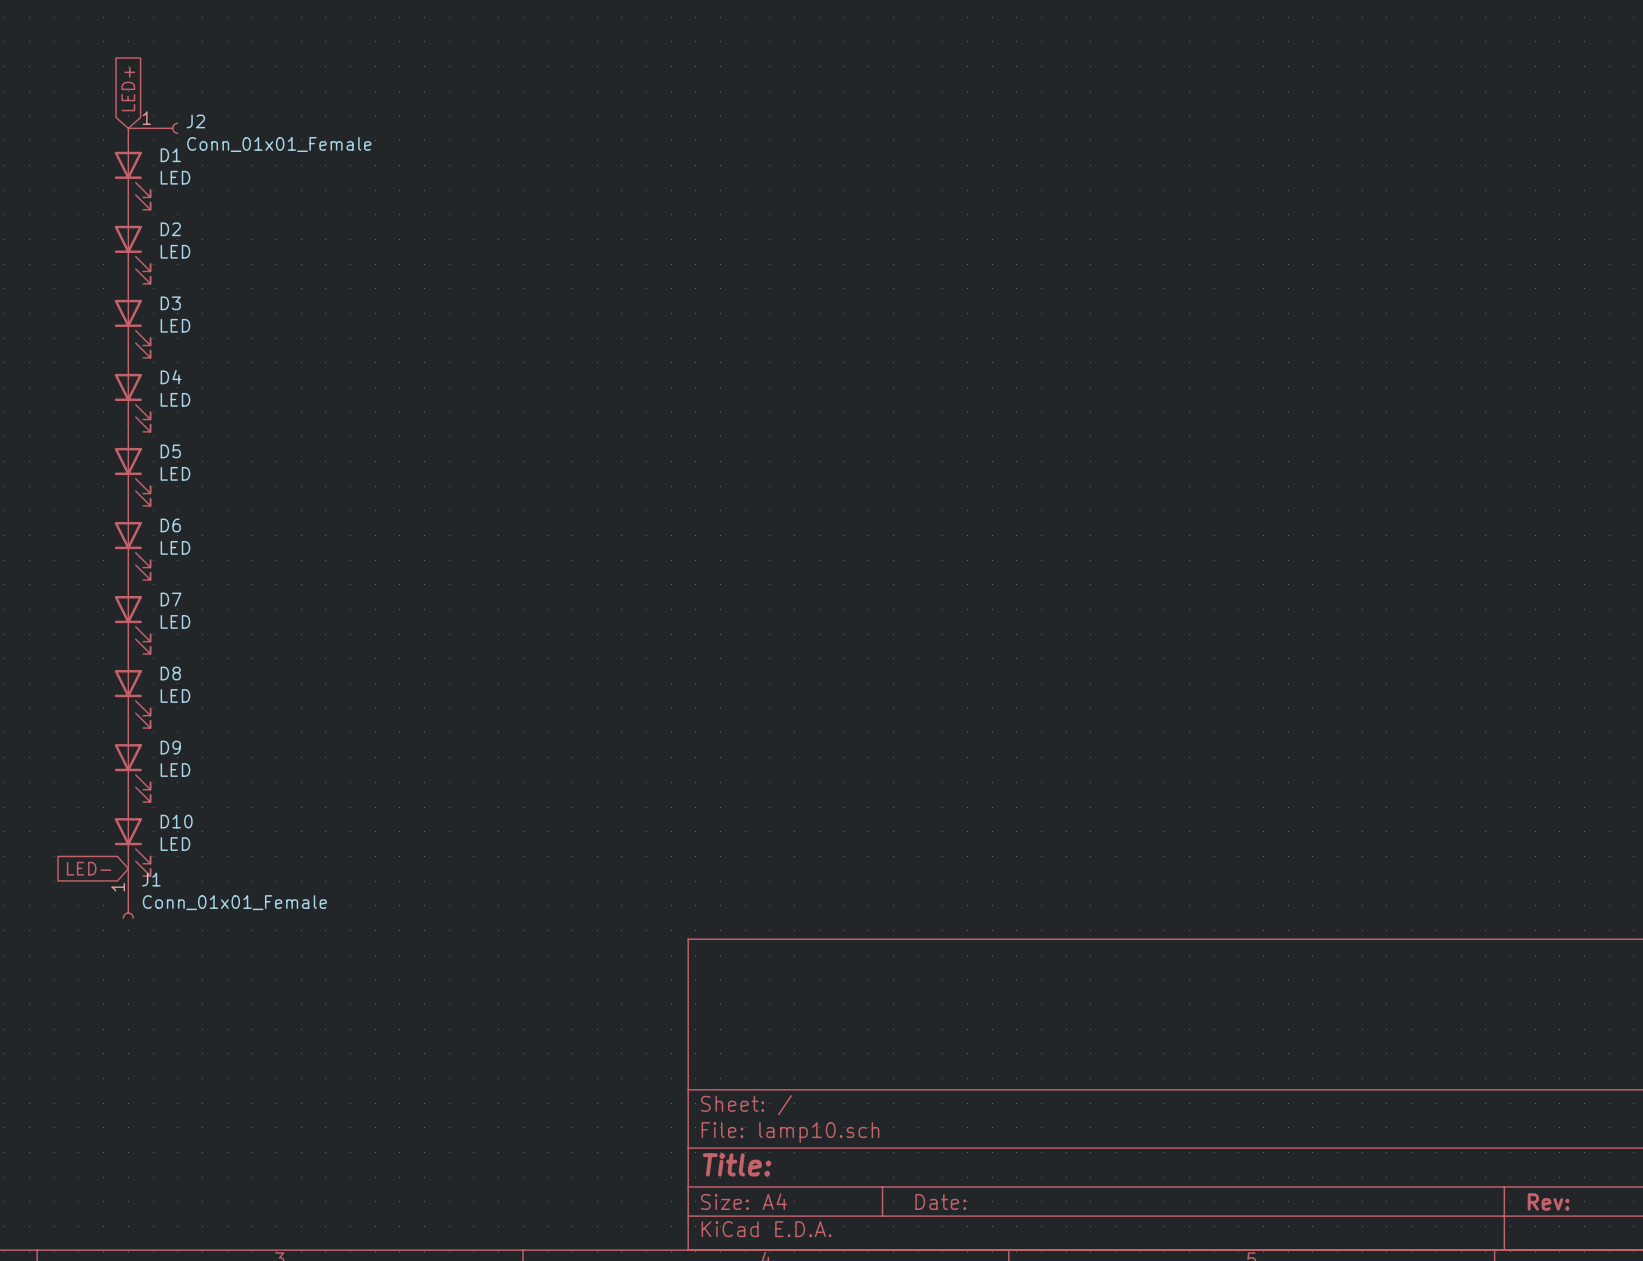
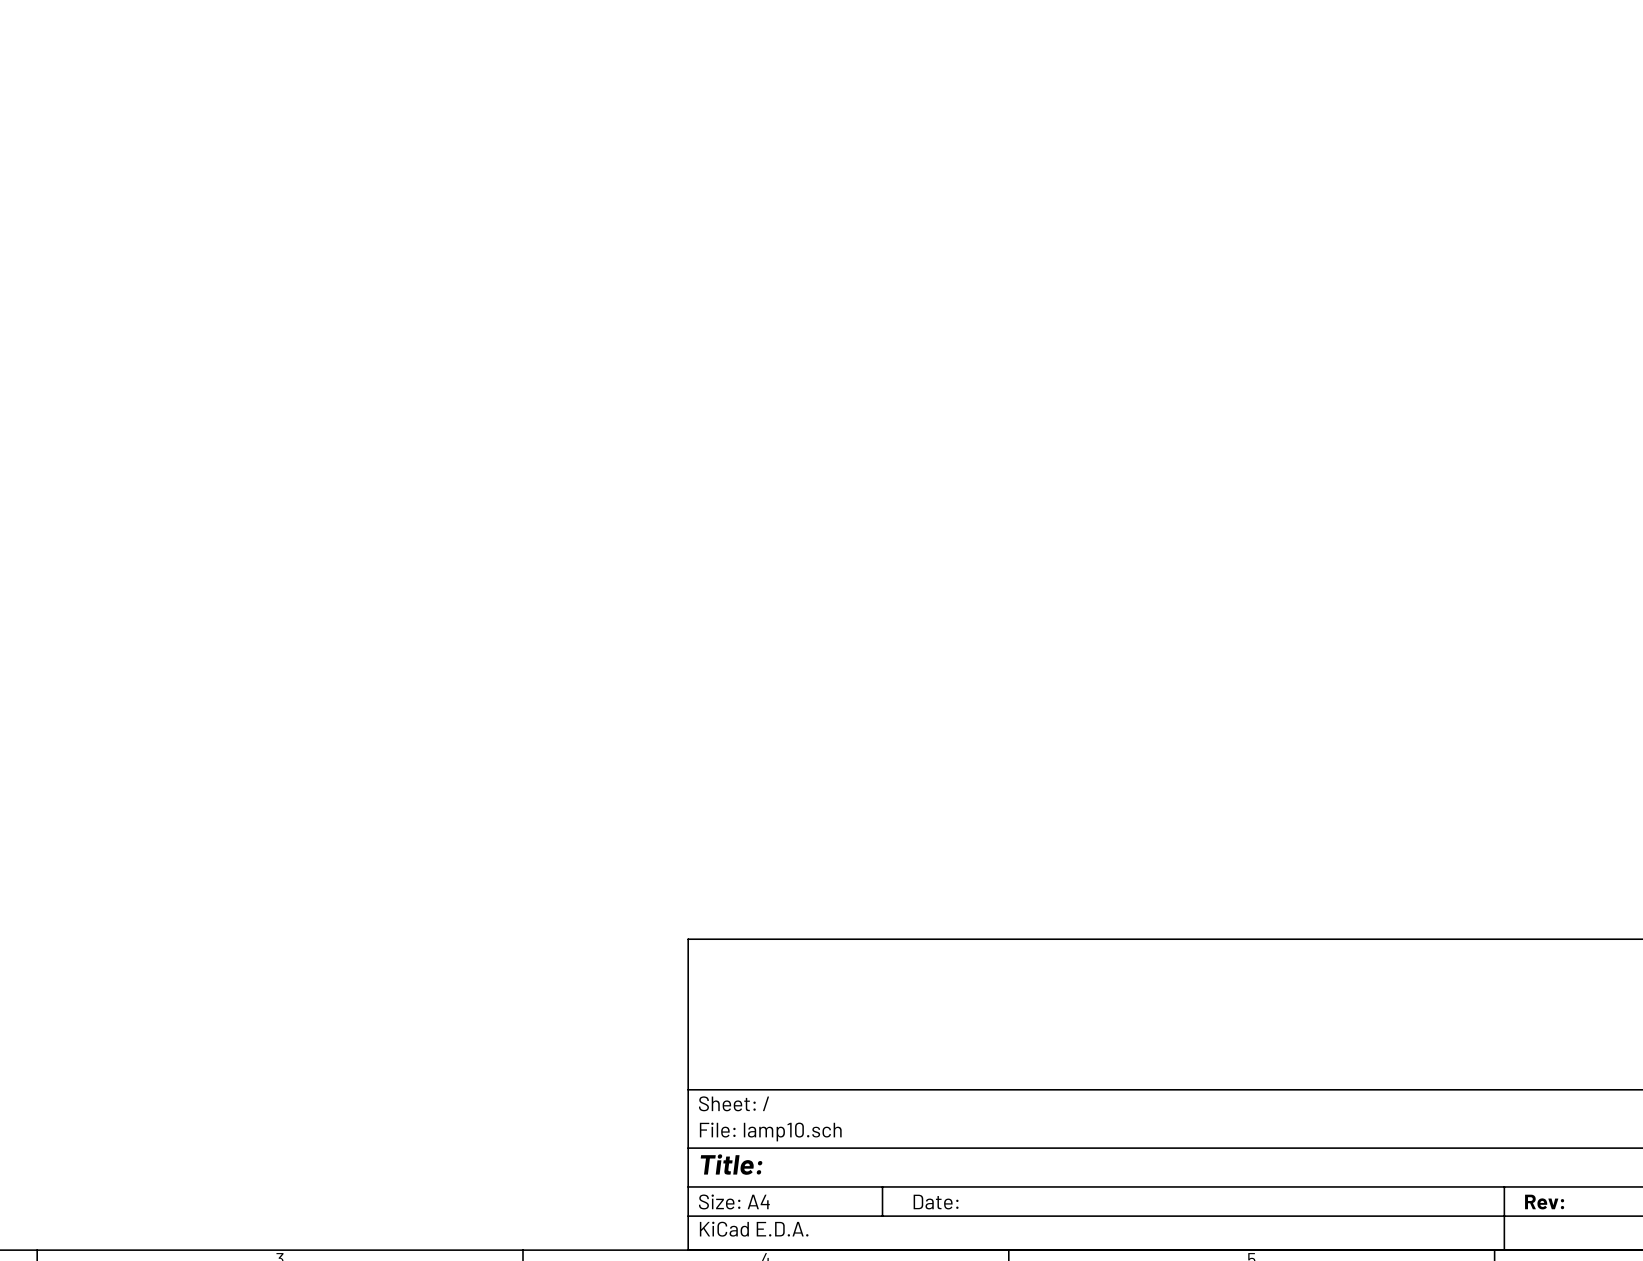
global label: LED+ (128, 89) -> none
J2: Conn_01x01_Female (153, 128) -> none
D1: LED (132, 169) -> none
D2: LED (132, 243) -> none
D3: LED (132, 317) -> none
D4: LED (132, 391) -> none
D5: LED (132, 465) -> none
D6: LED (132, 539) -> none
D7: LED (132, 613) -> none
D8: LED (132, 687) -> none
D9: LED (132, 761) -> none
D10: LED (132, 835) -> none
global label: LED- (89, 868) -> none
J1: Conn_01x01_Female (128, 893) -> none

